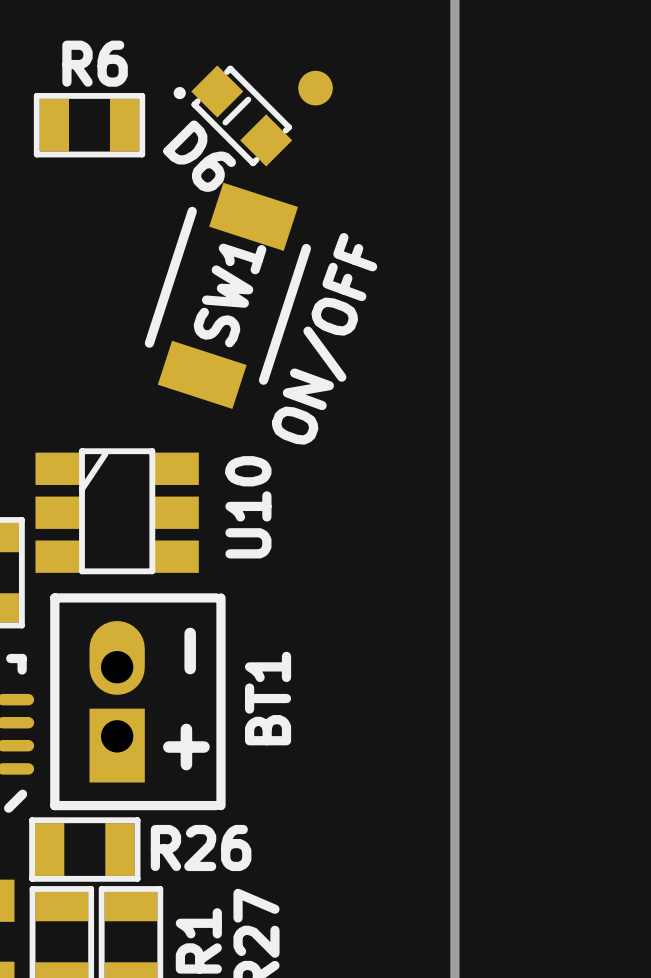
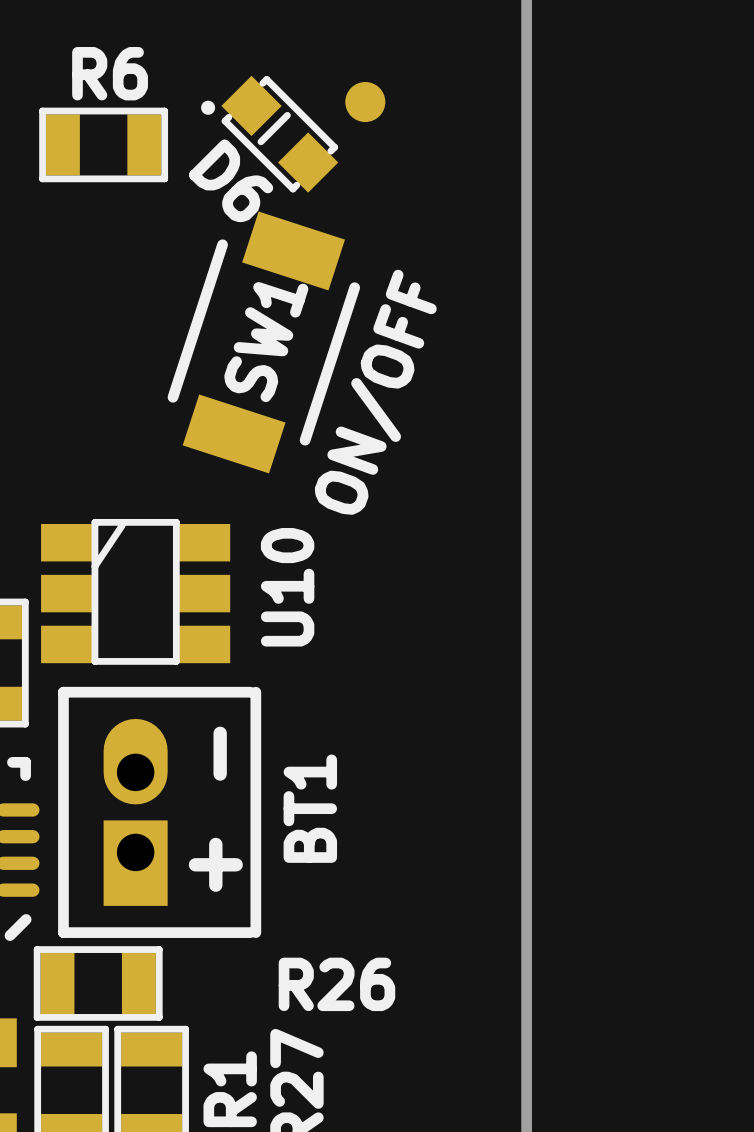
R26 name position: R26 (201, 847) -> R26 (336, 984)

